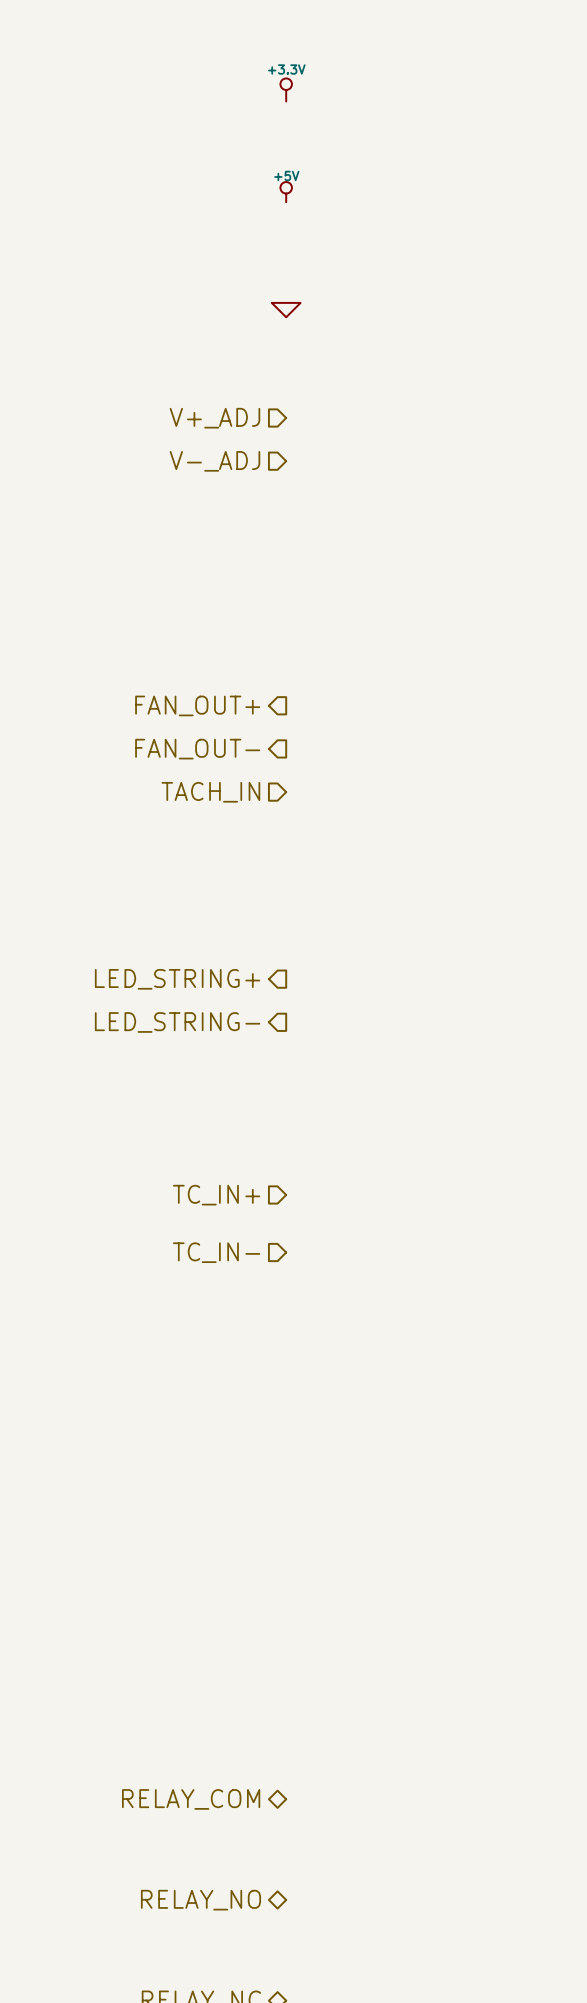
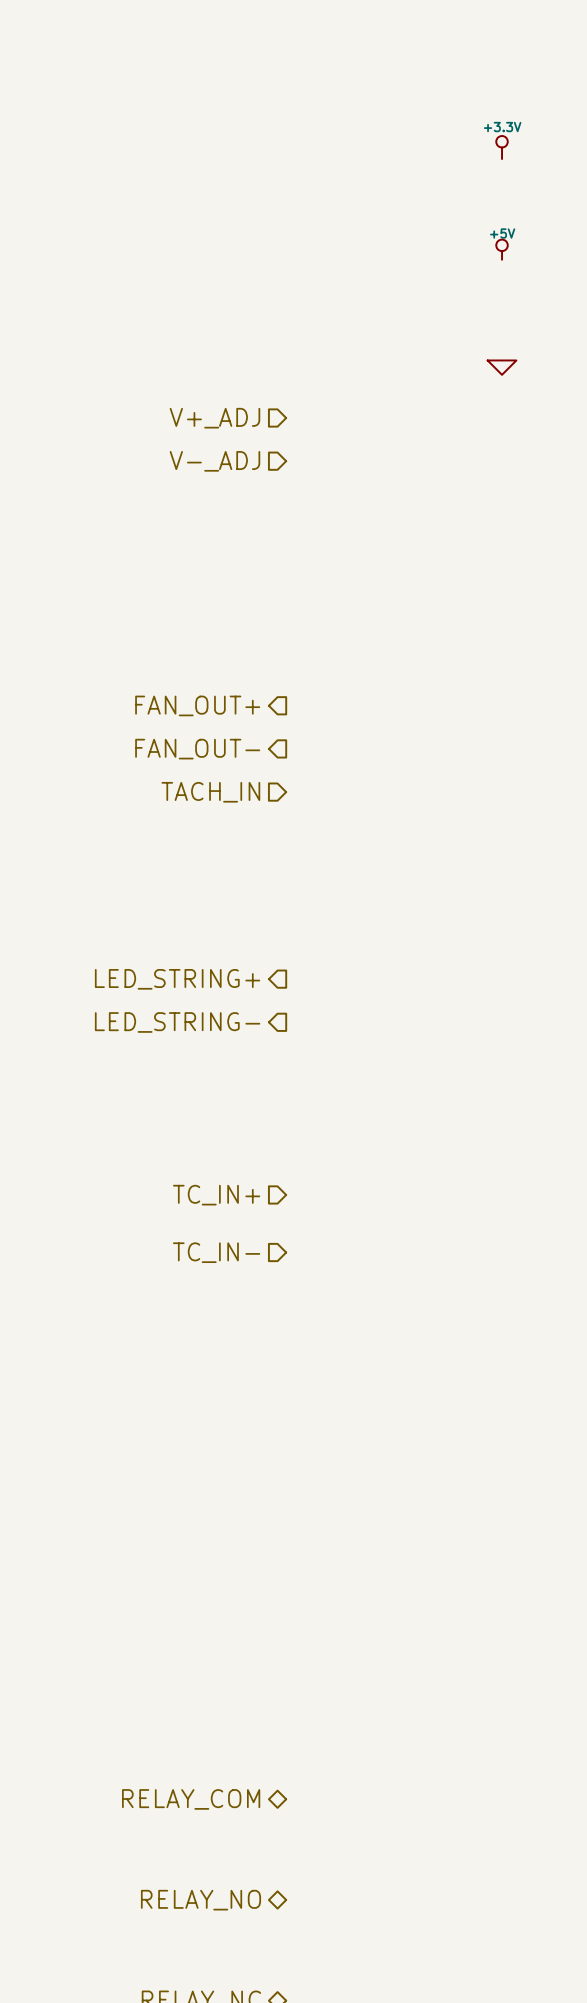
power symbol position: +3.3V (286, 89) -> +3.3V (502, 147)
power symbol position: +5V (286, 192) -> +5V (502, 249)
power symbol position: (286, 310) -> (502, 367)

